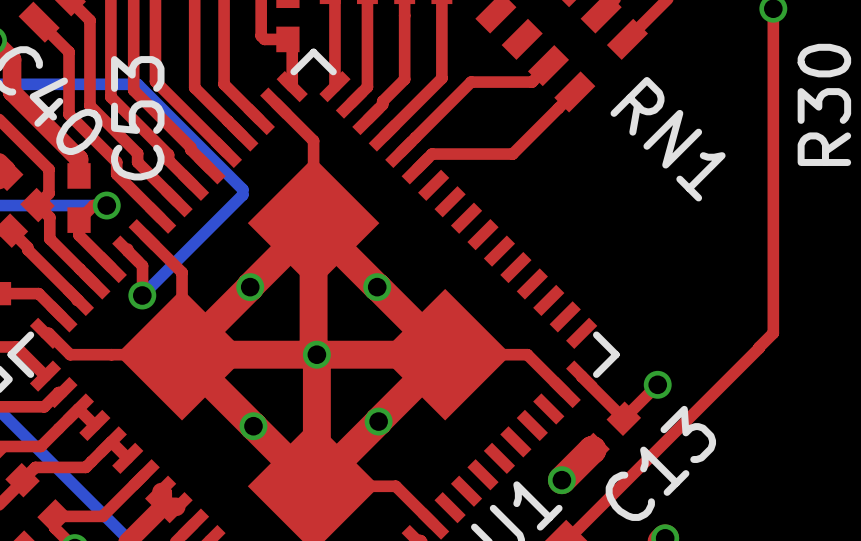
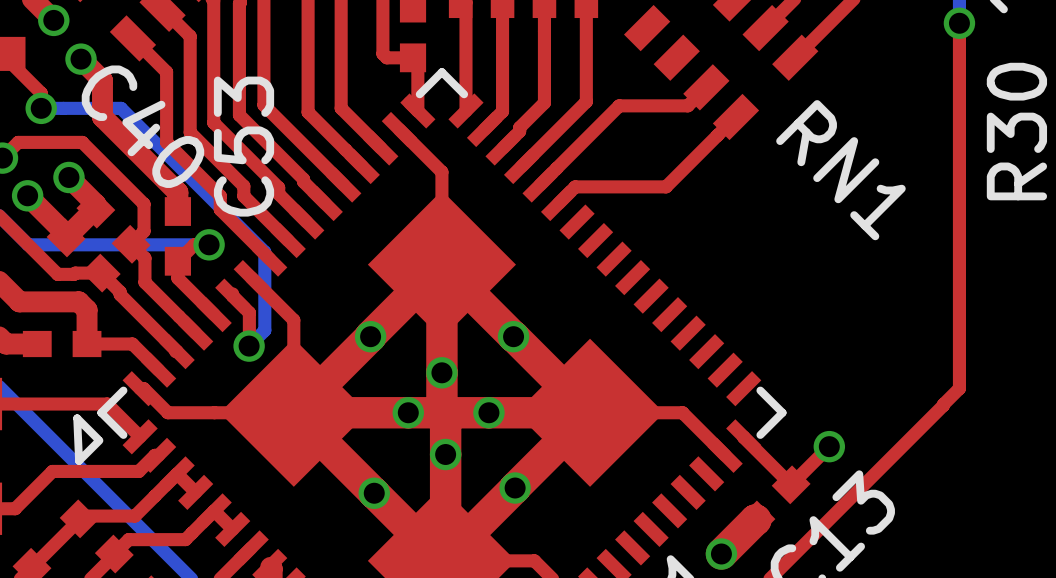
bottom track: (28, 84) (137, 84) (242, 189) (242, 195) (156, 281) -> (121, 108) (264, 252) (264, 330)
via: none -> (441, 372)
via: none -> (408, 412)
via: (316, 354) -> none
via: none -> (488, 412)
via: none -> (445, 454)

